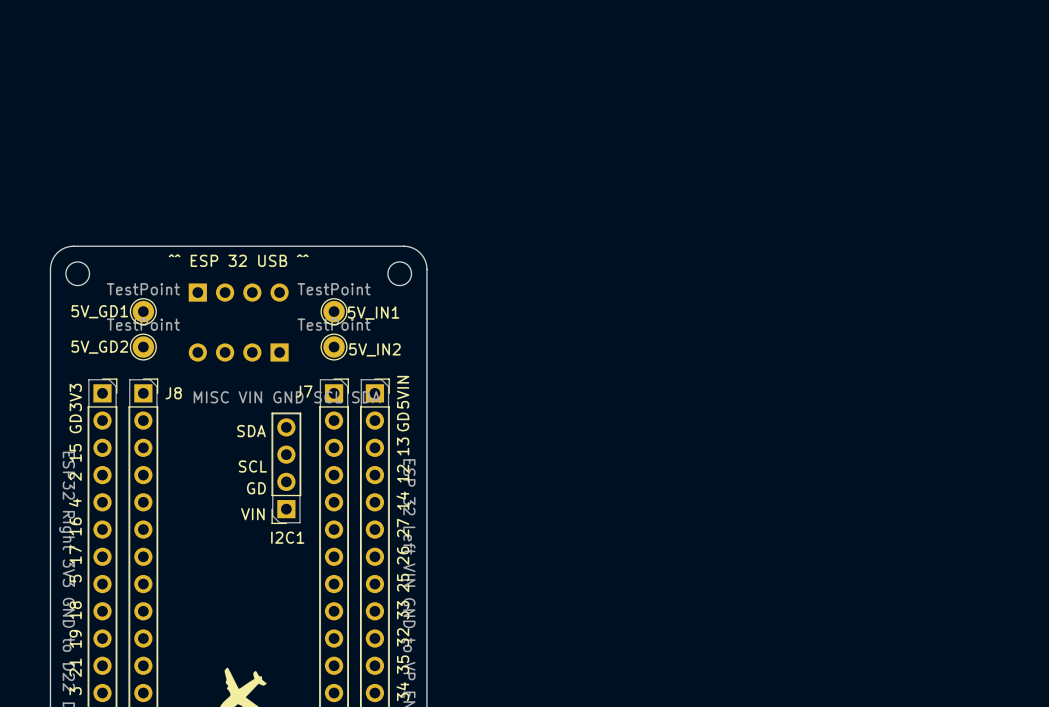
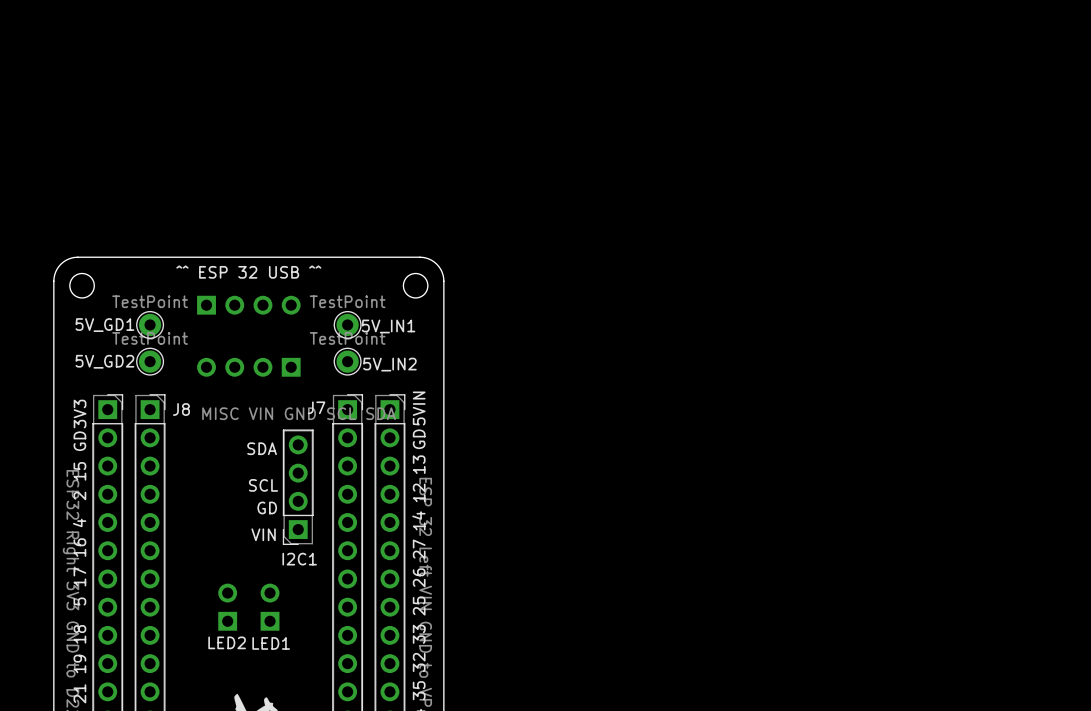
part: none -> (227, 607)
part: none -> (270, 607)
text: none -> LED2 (227, 642)
text: none -> LED1 (271, 643)

